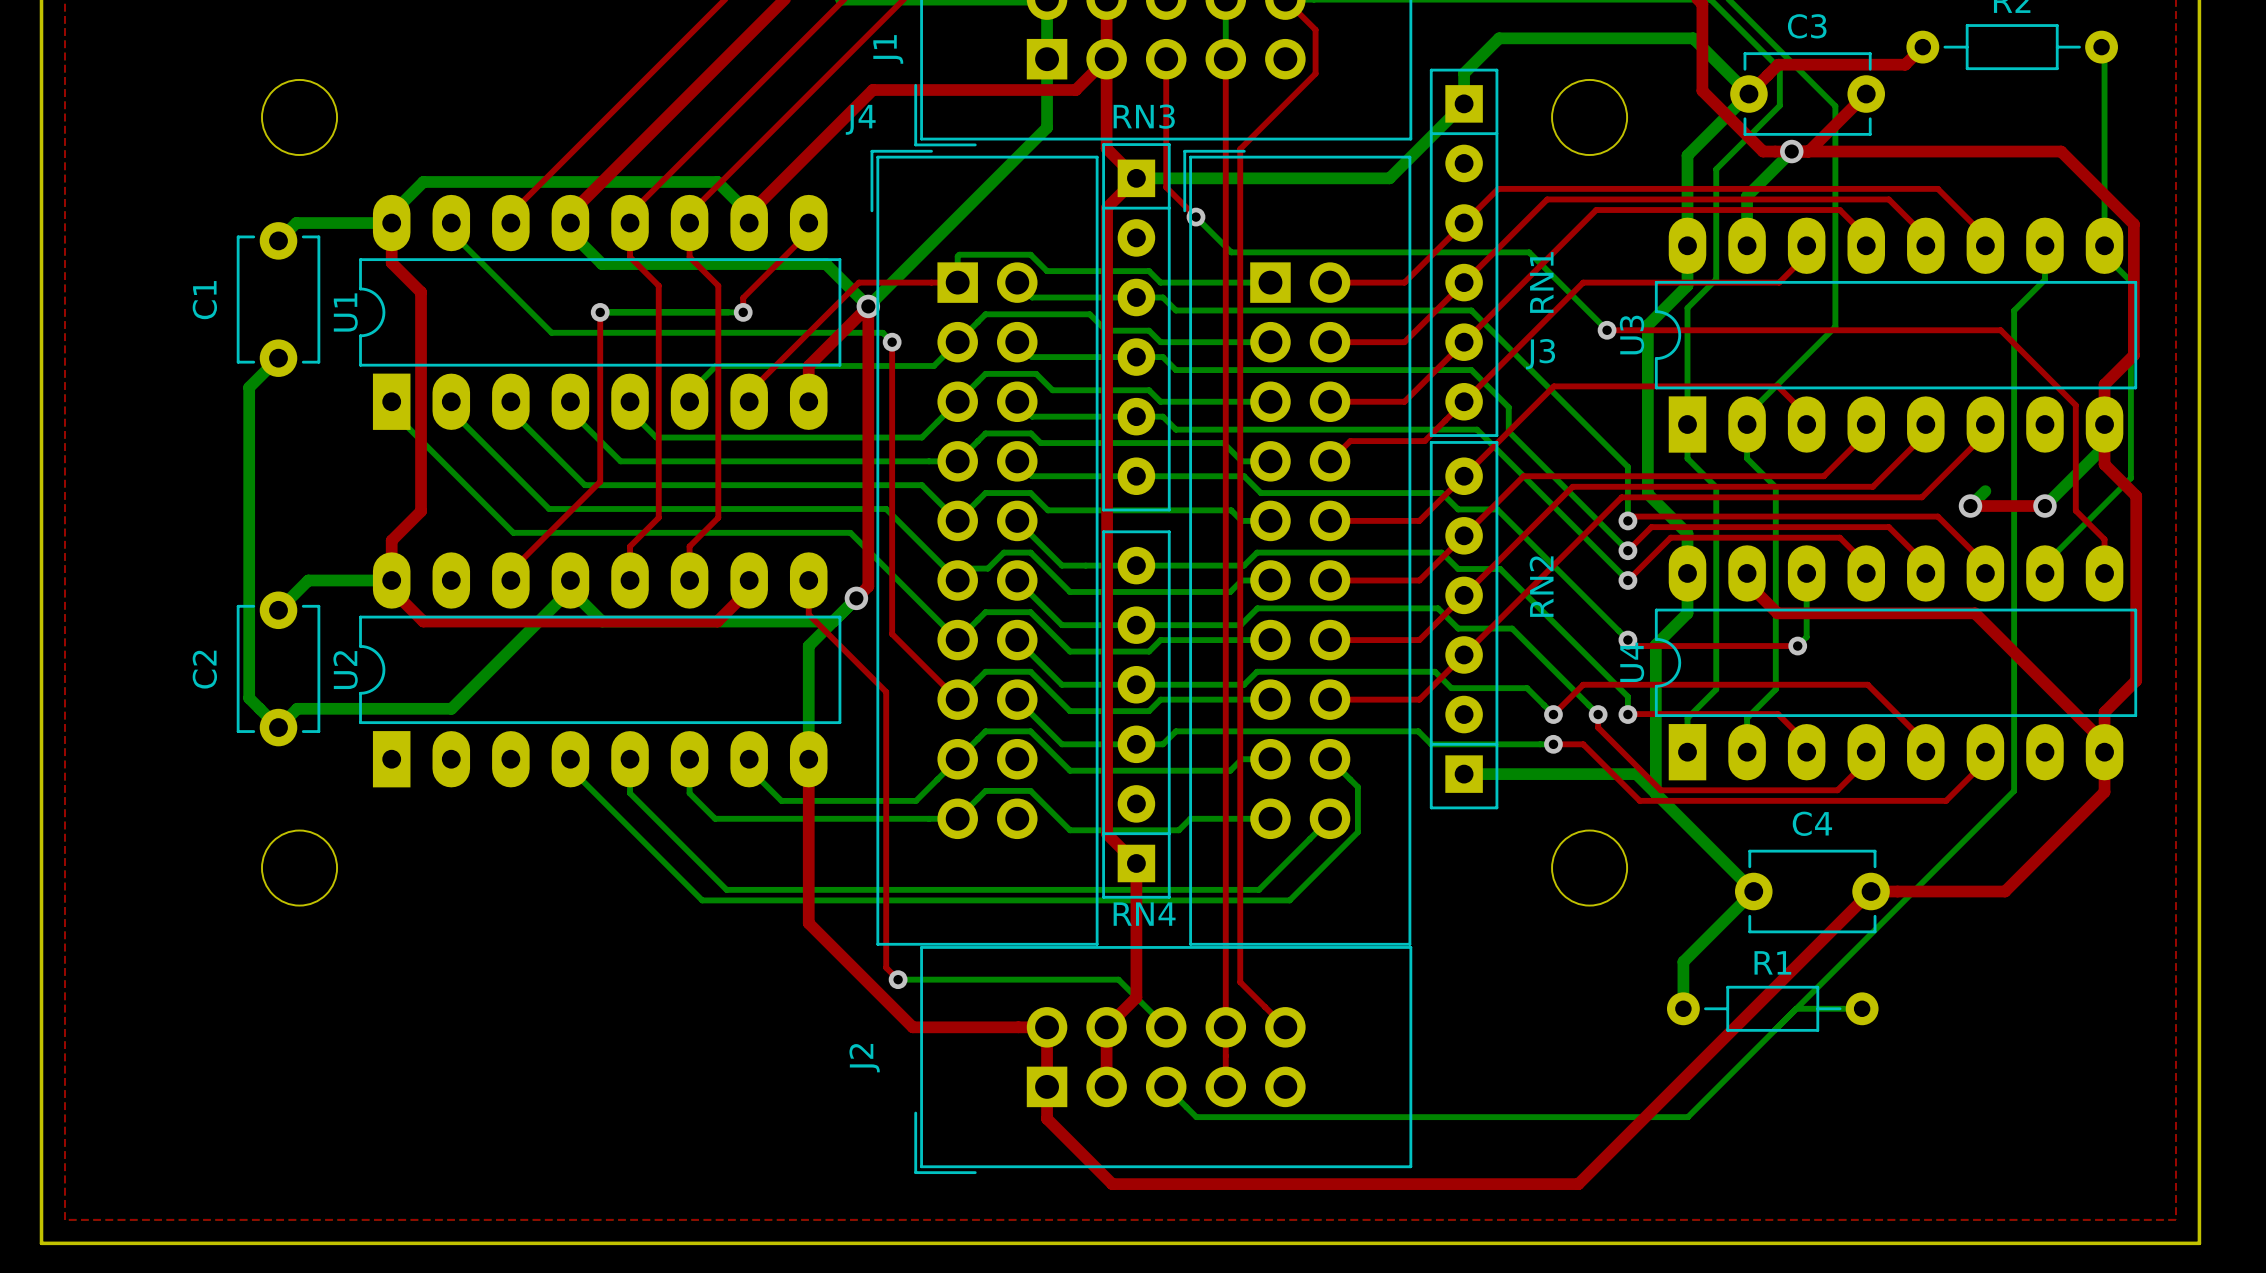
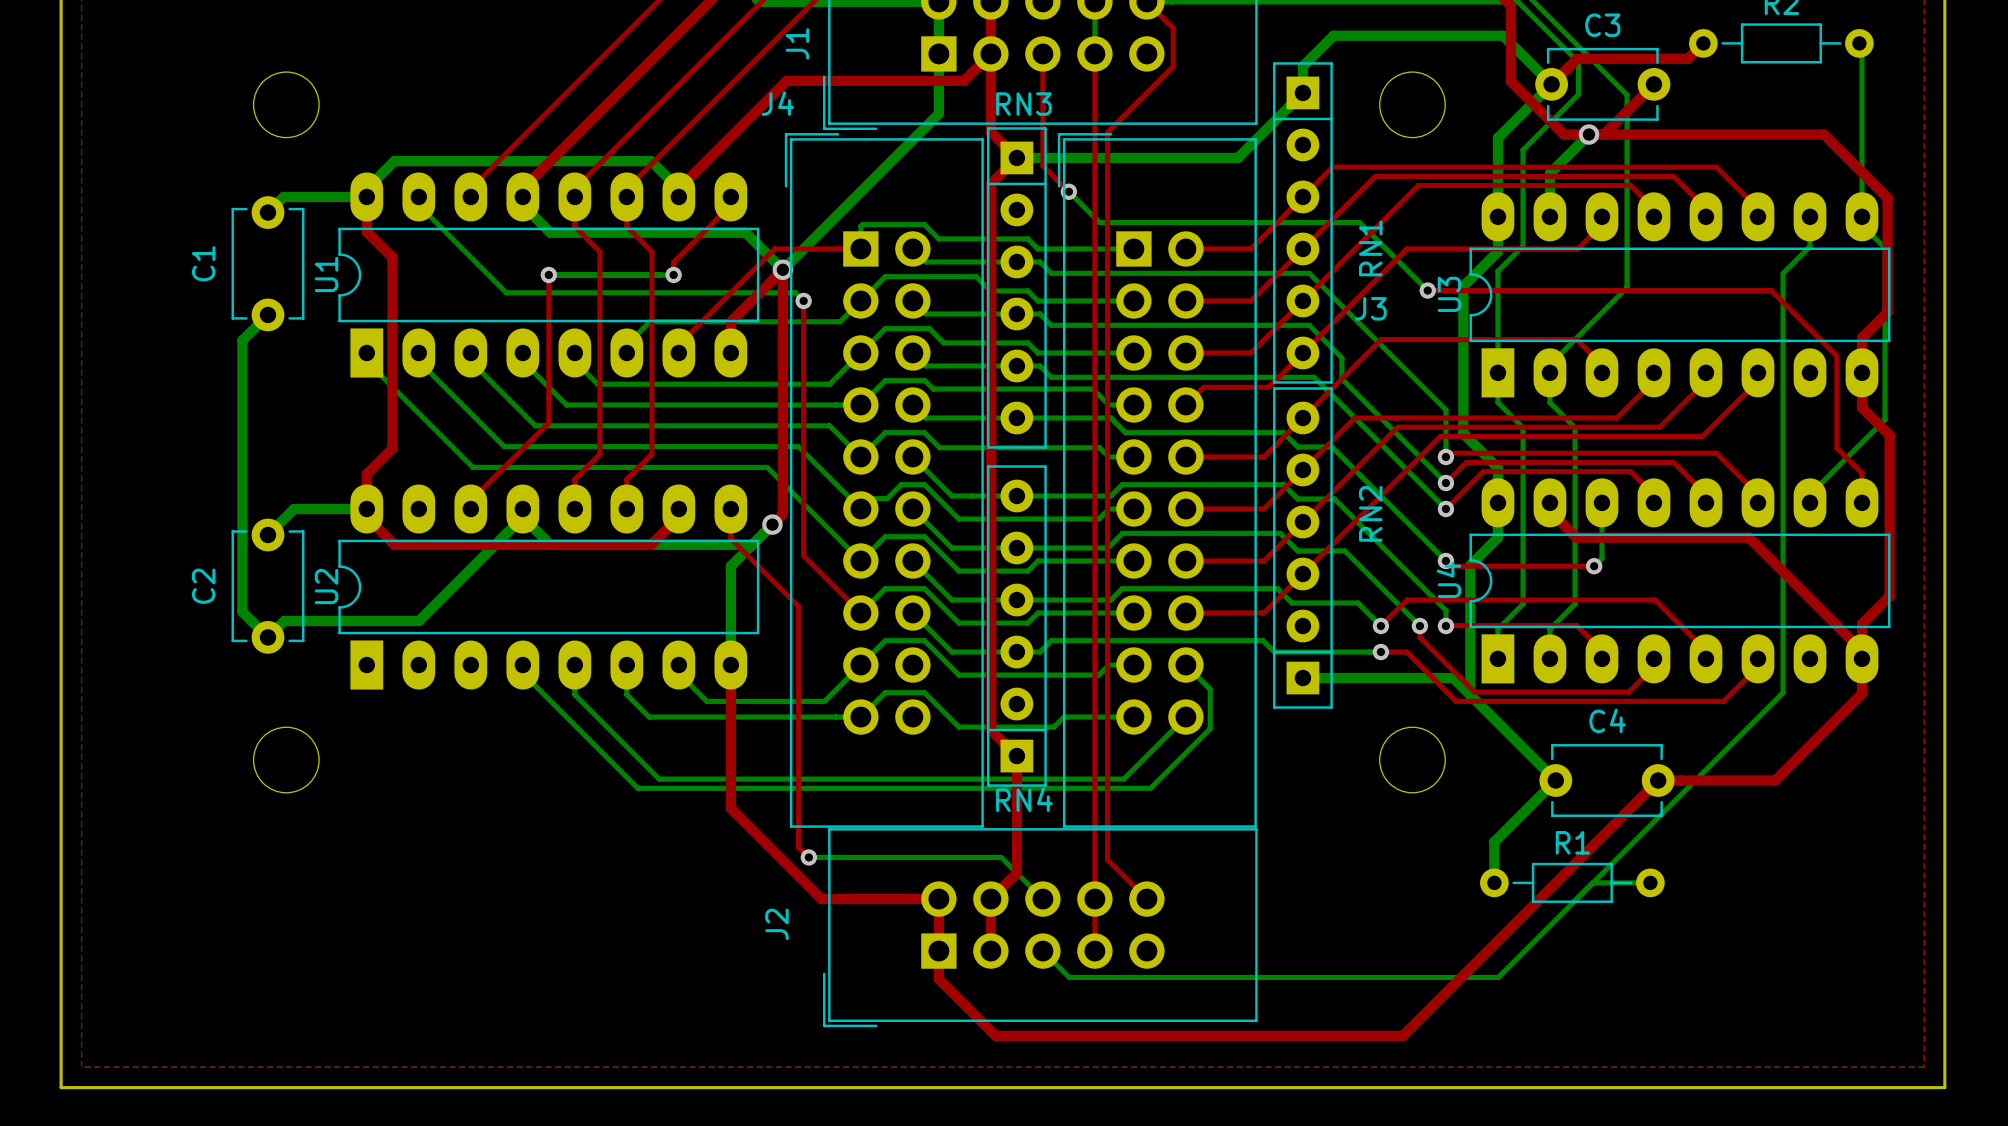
bottom track: (2104, 424) (2104, 446) (2044, 506) -> none
bottom track: (1985, 491) (1970, 506) -> none
top track: (1970, 506) (2044, 506) -> none
via: (1970, 506) -> none
via: (2044, 506) -> none

